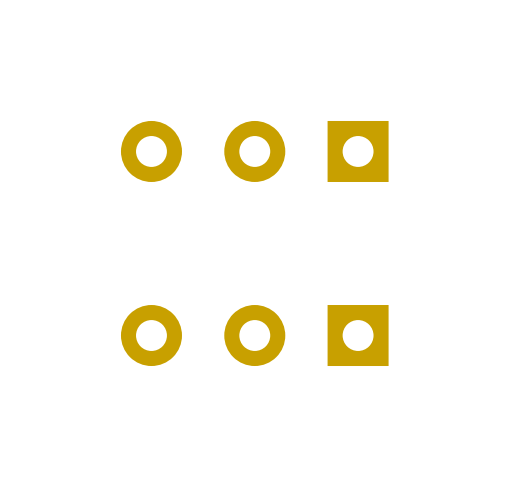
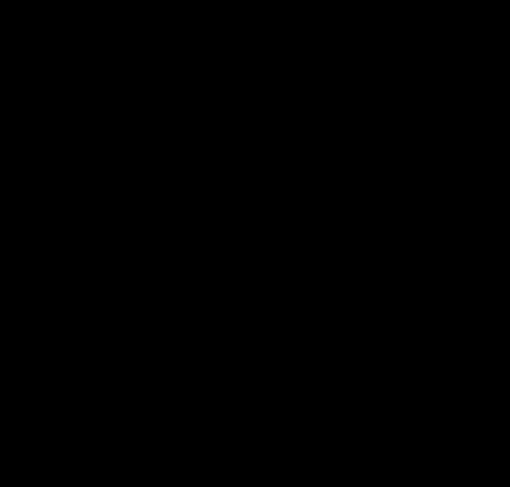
part: (254, 151) -> none
part: (254, 335) -> none

